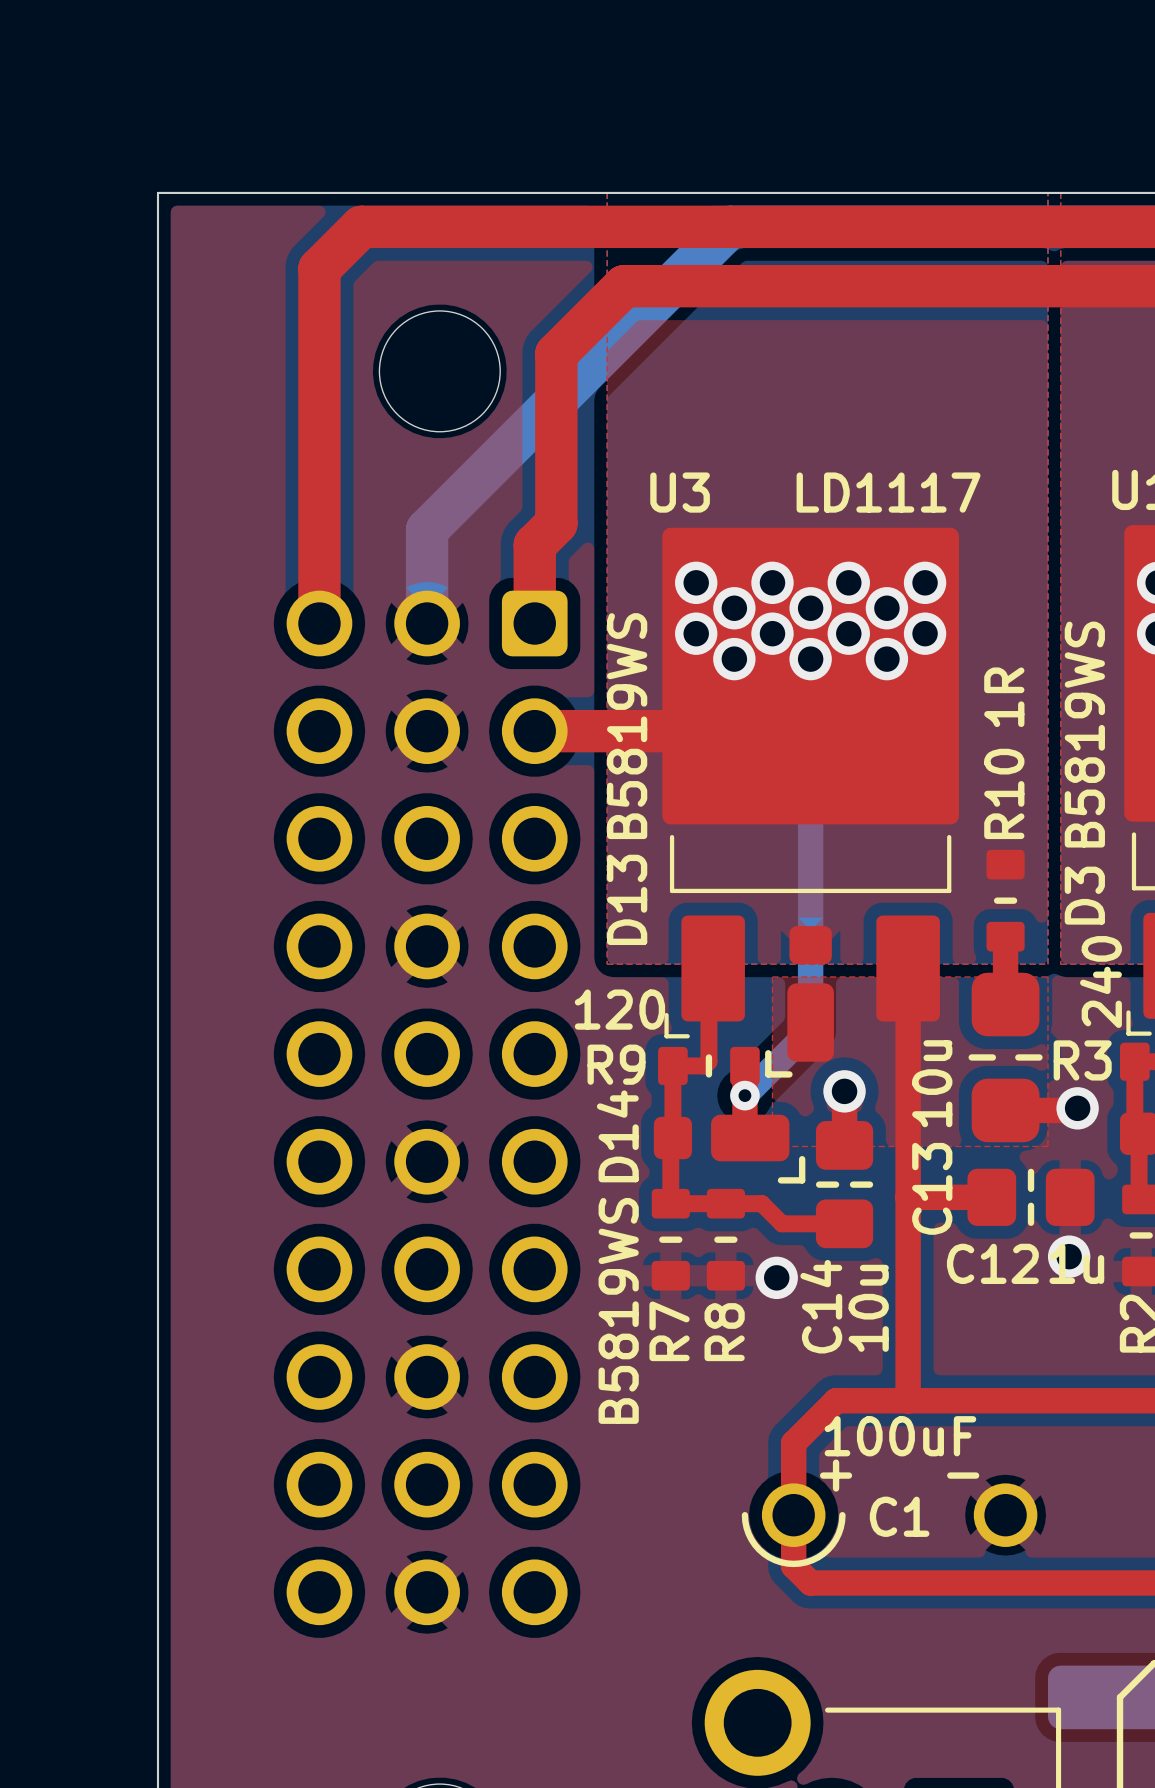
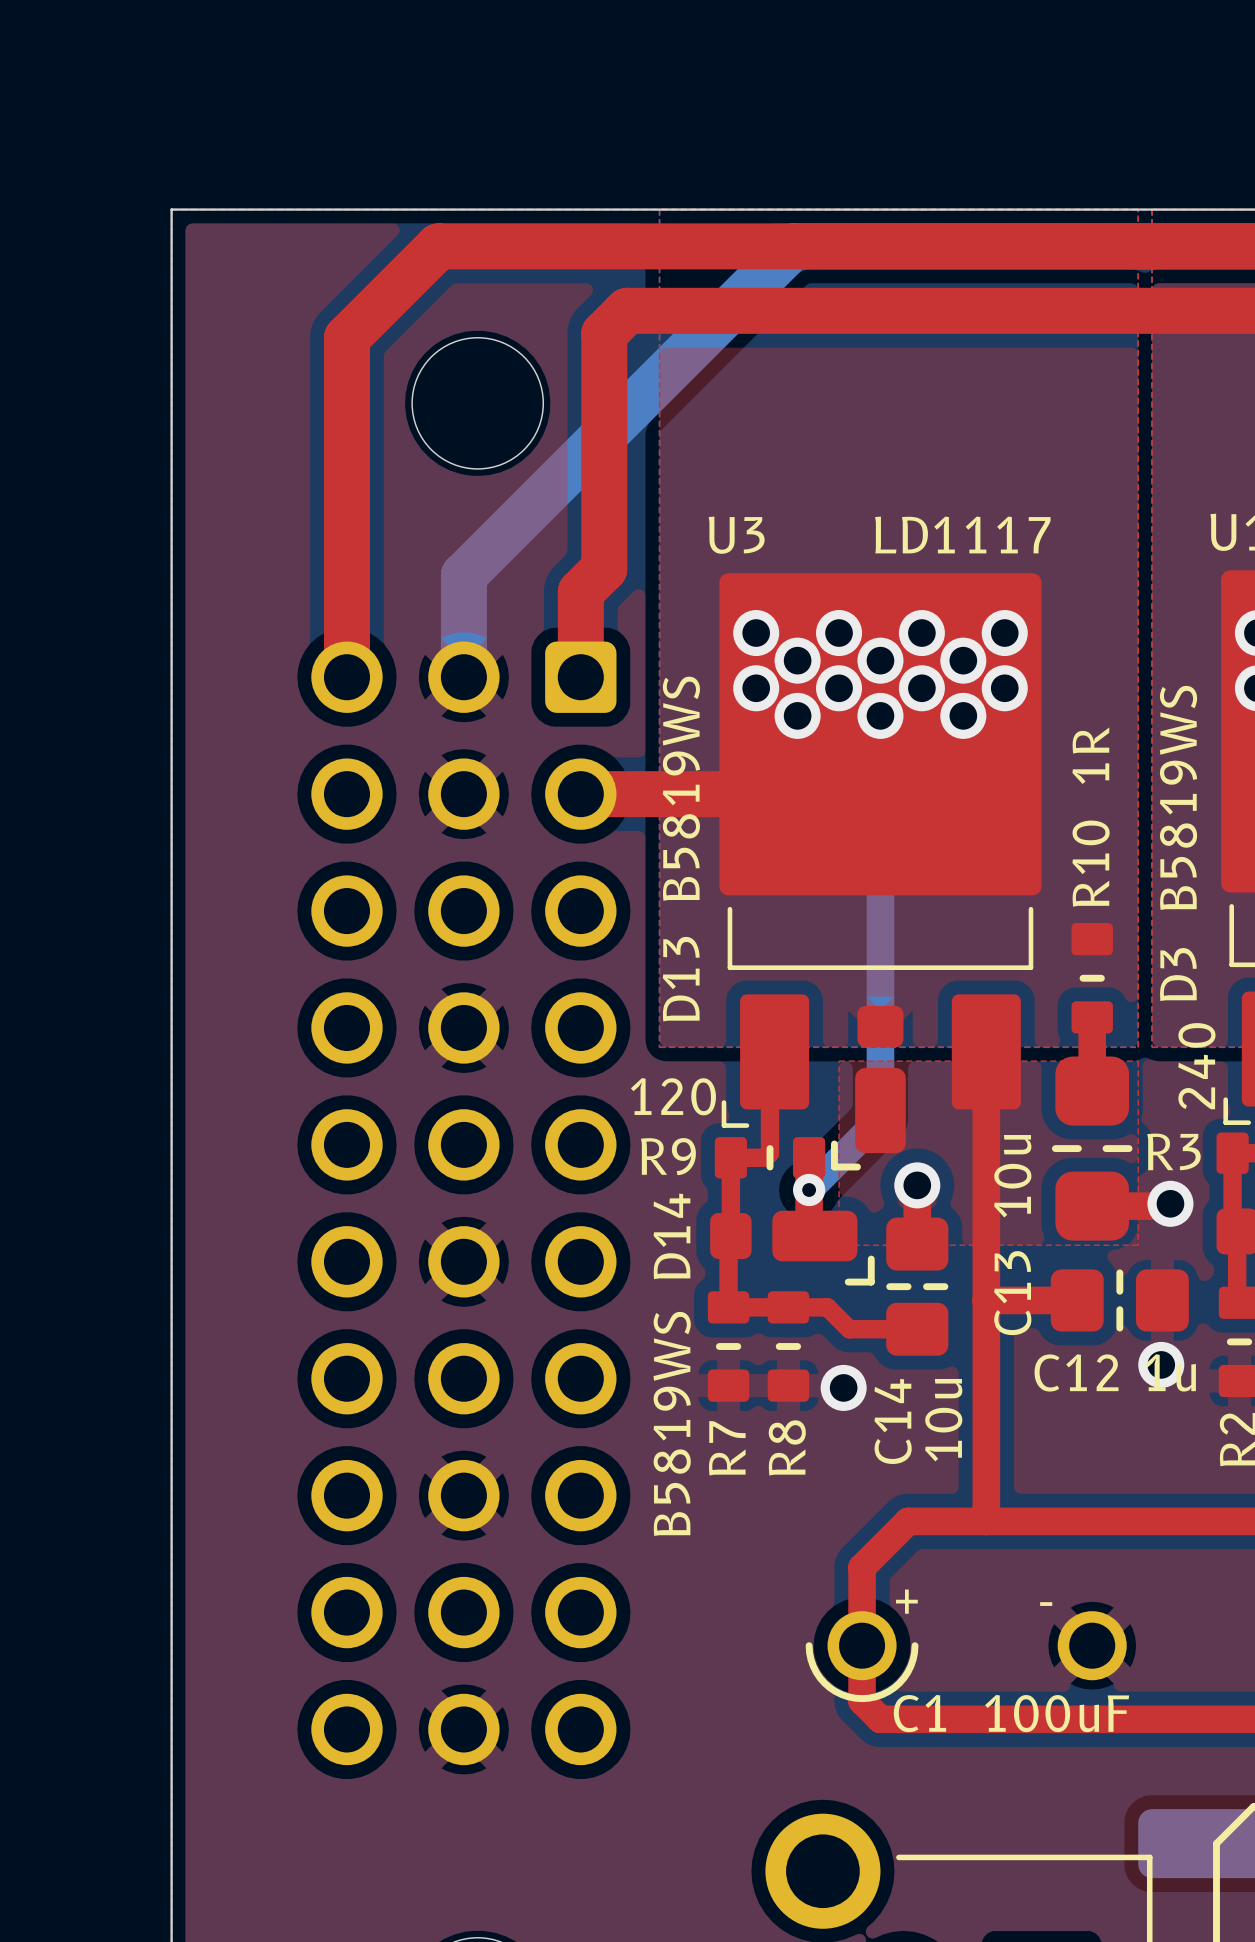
top track: (403, 226) (361, 226) (319, 268) (319, 311) -> (438, 246) (346, 337)
top track: (624, 286) (556, 353) -> (677, 310) (627, 310) (604, 333) (604, 384)
C1 value position: 100uF (900, 1436) -> 100uF (1057, 1713)
C1 name position: C1 (899, 1516) -> C1 (919, 1713)

